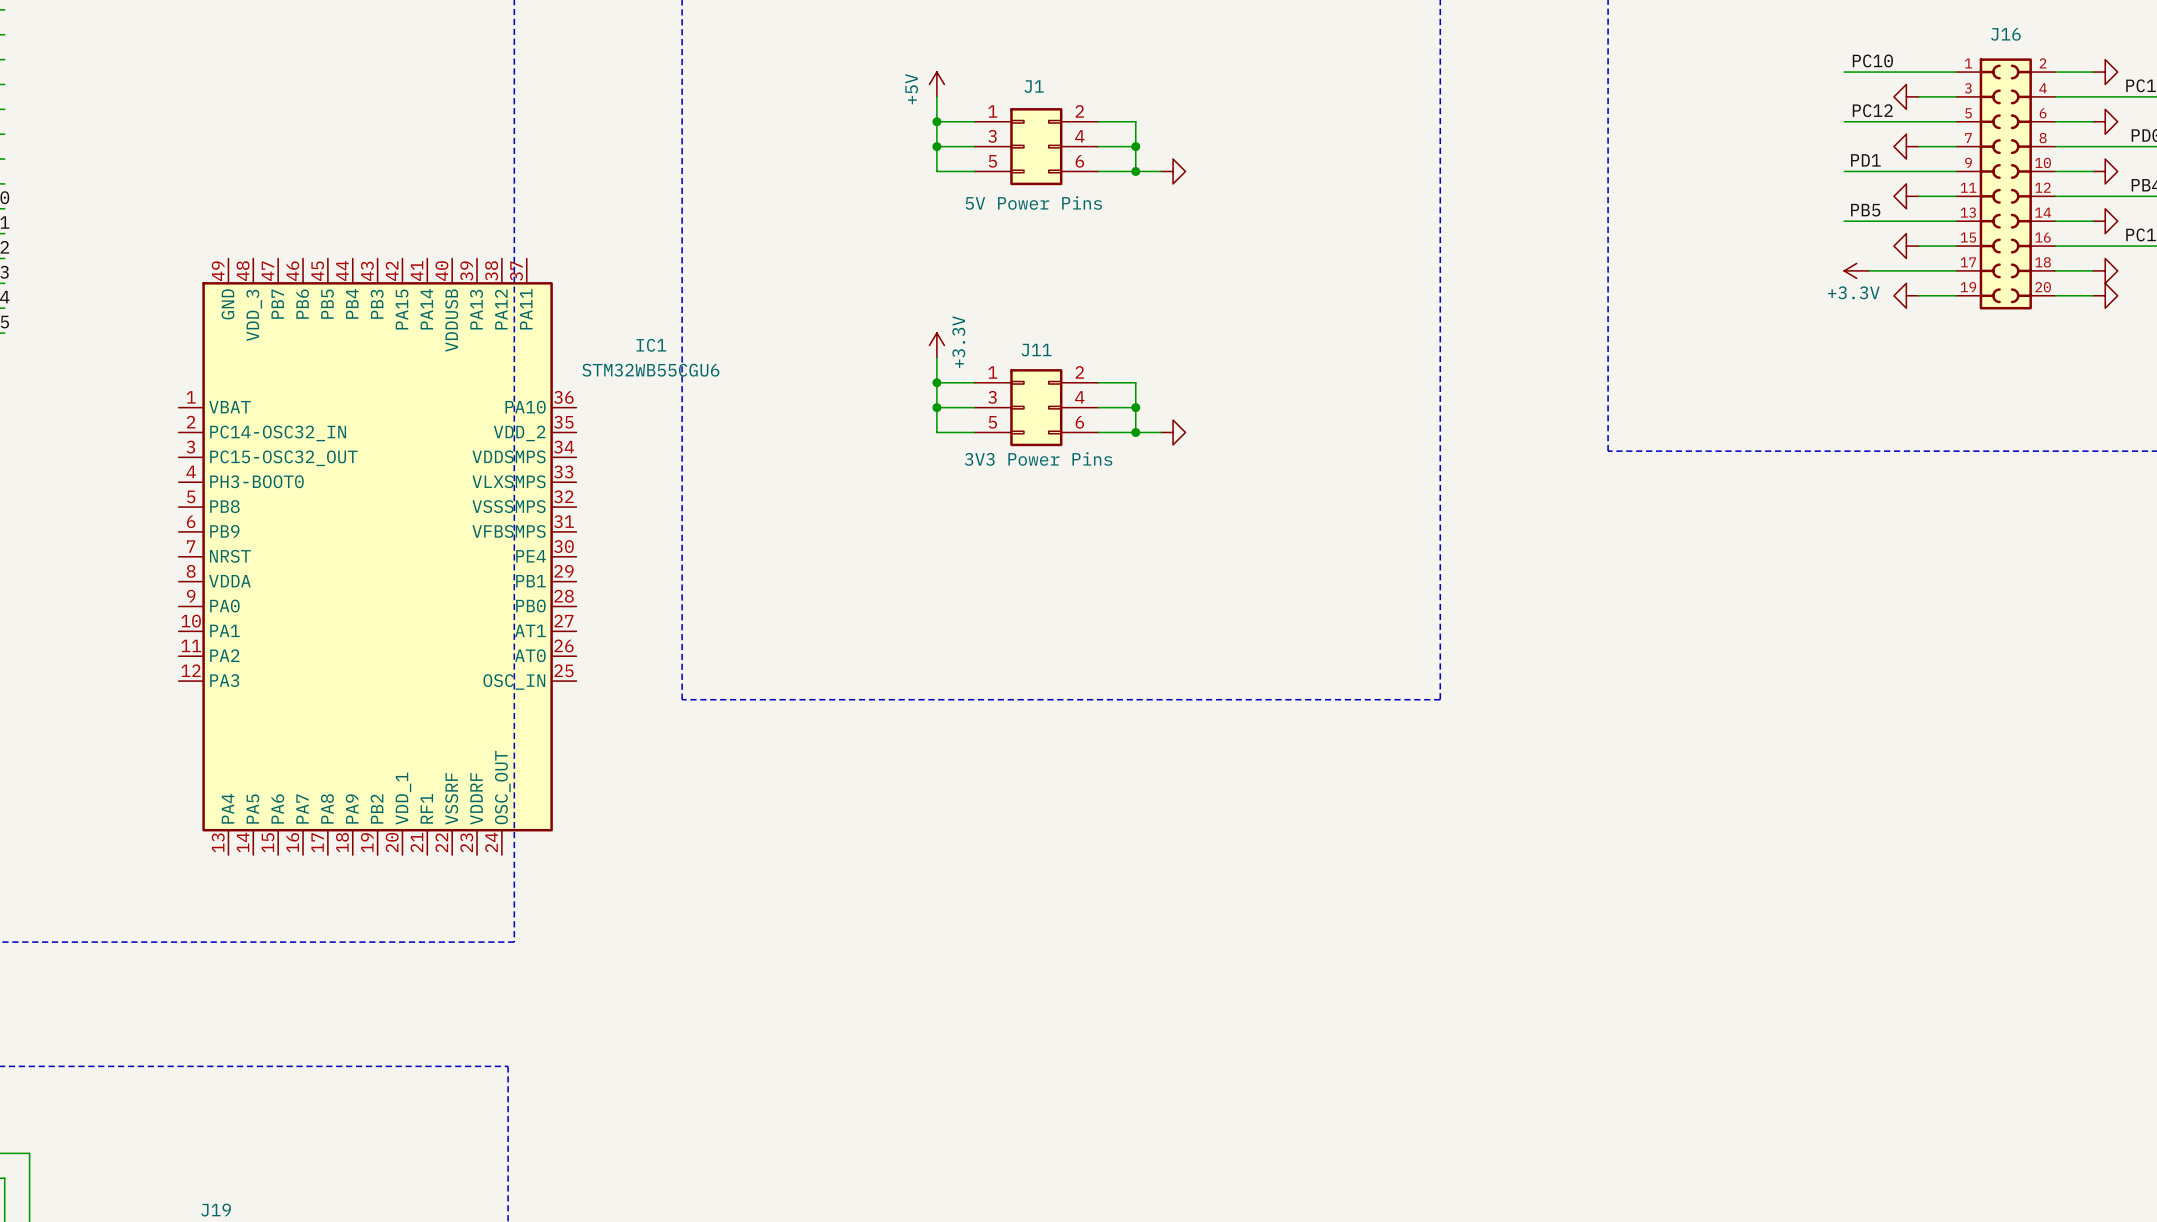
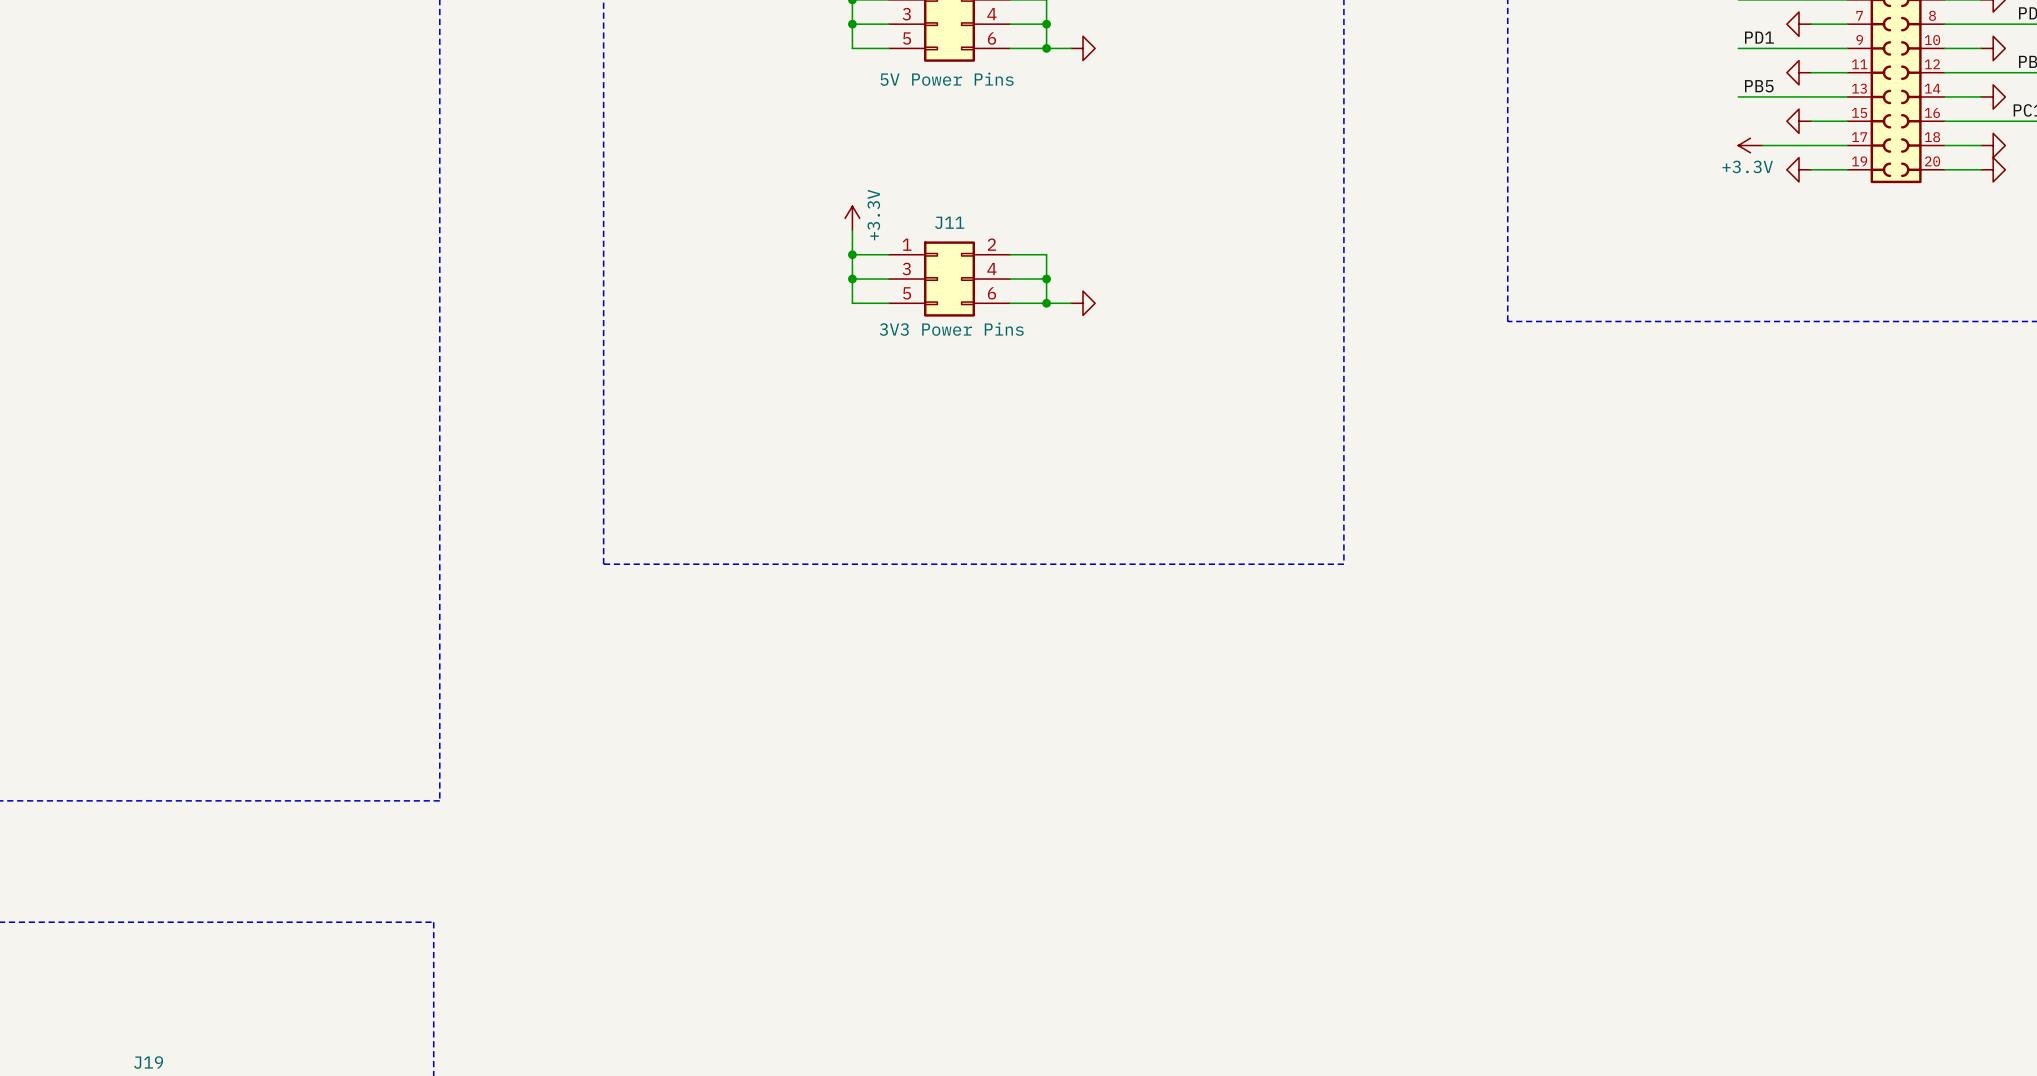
IC1: STM32WB55CGU6 (377, 556) -> none

